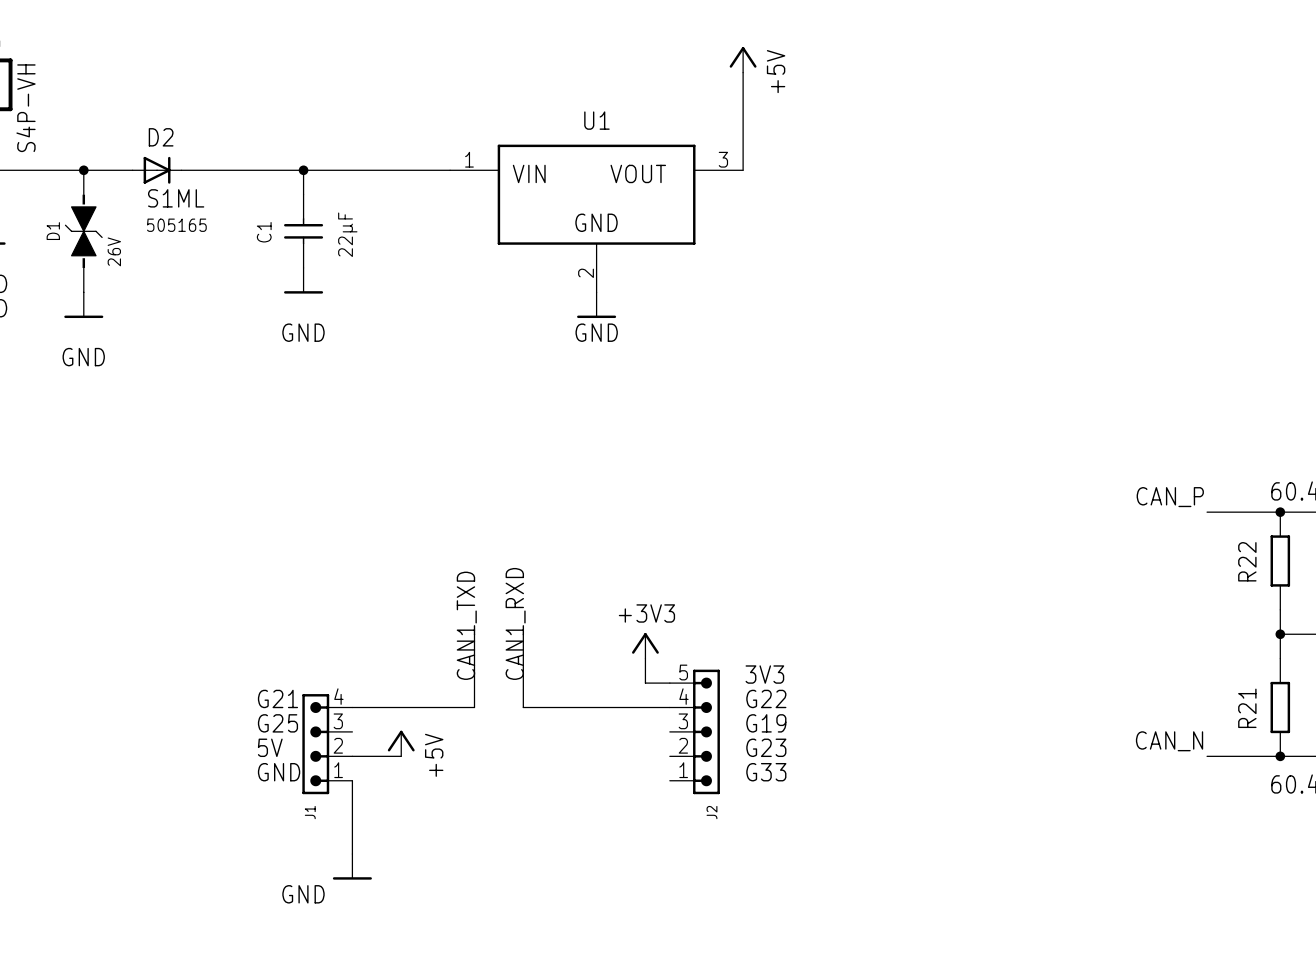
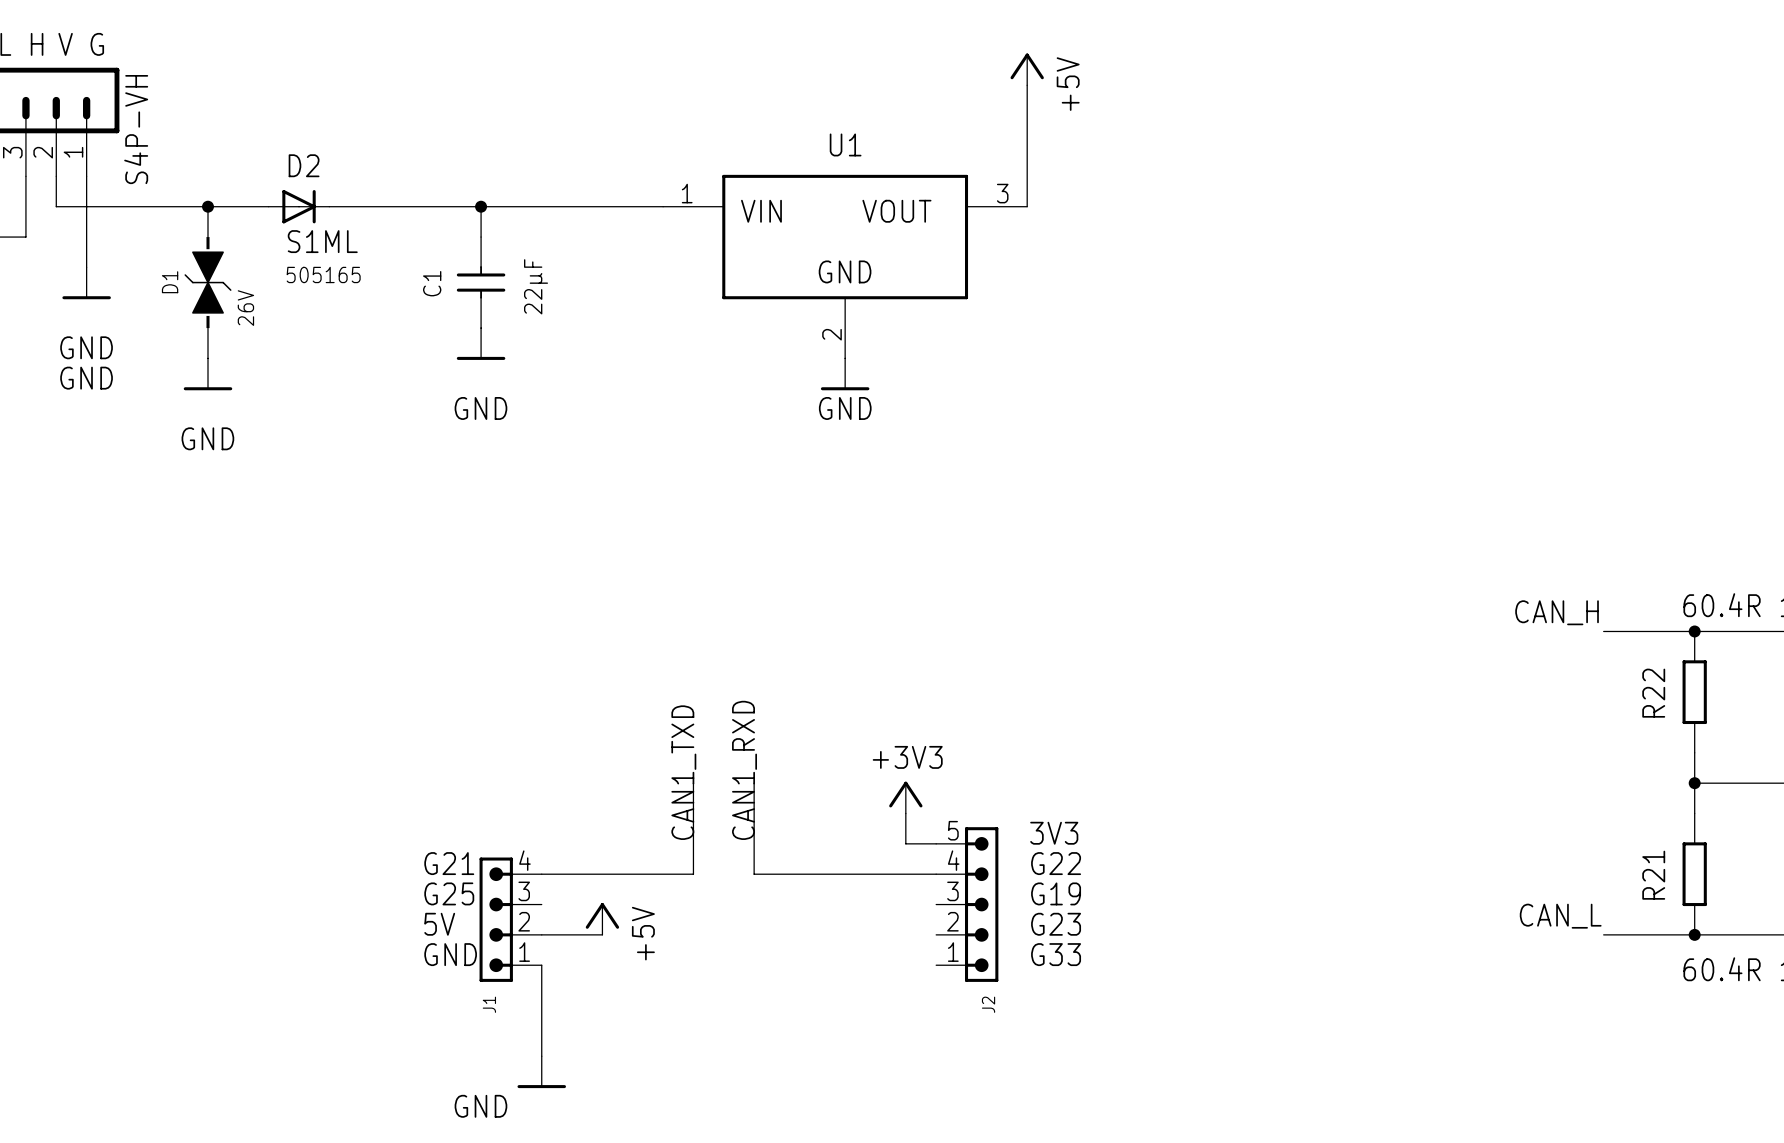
label: CAN_P (1170, 497) -> CAN_H (1557, 612)
label: CAN_N (1169, 741) -> CAN_L (1560, 916)

